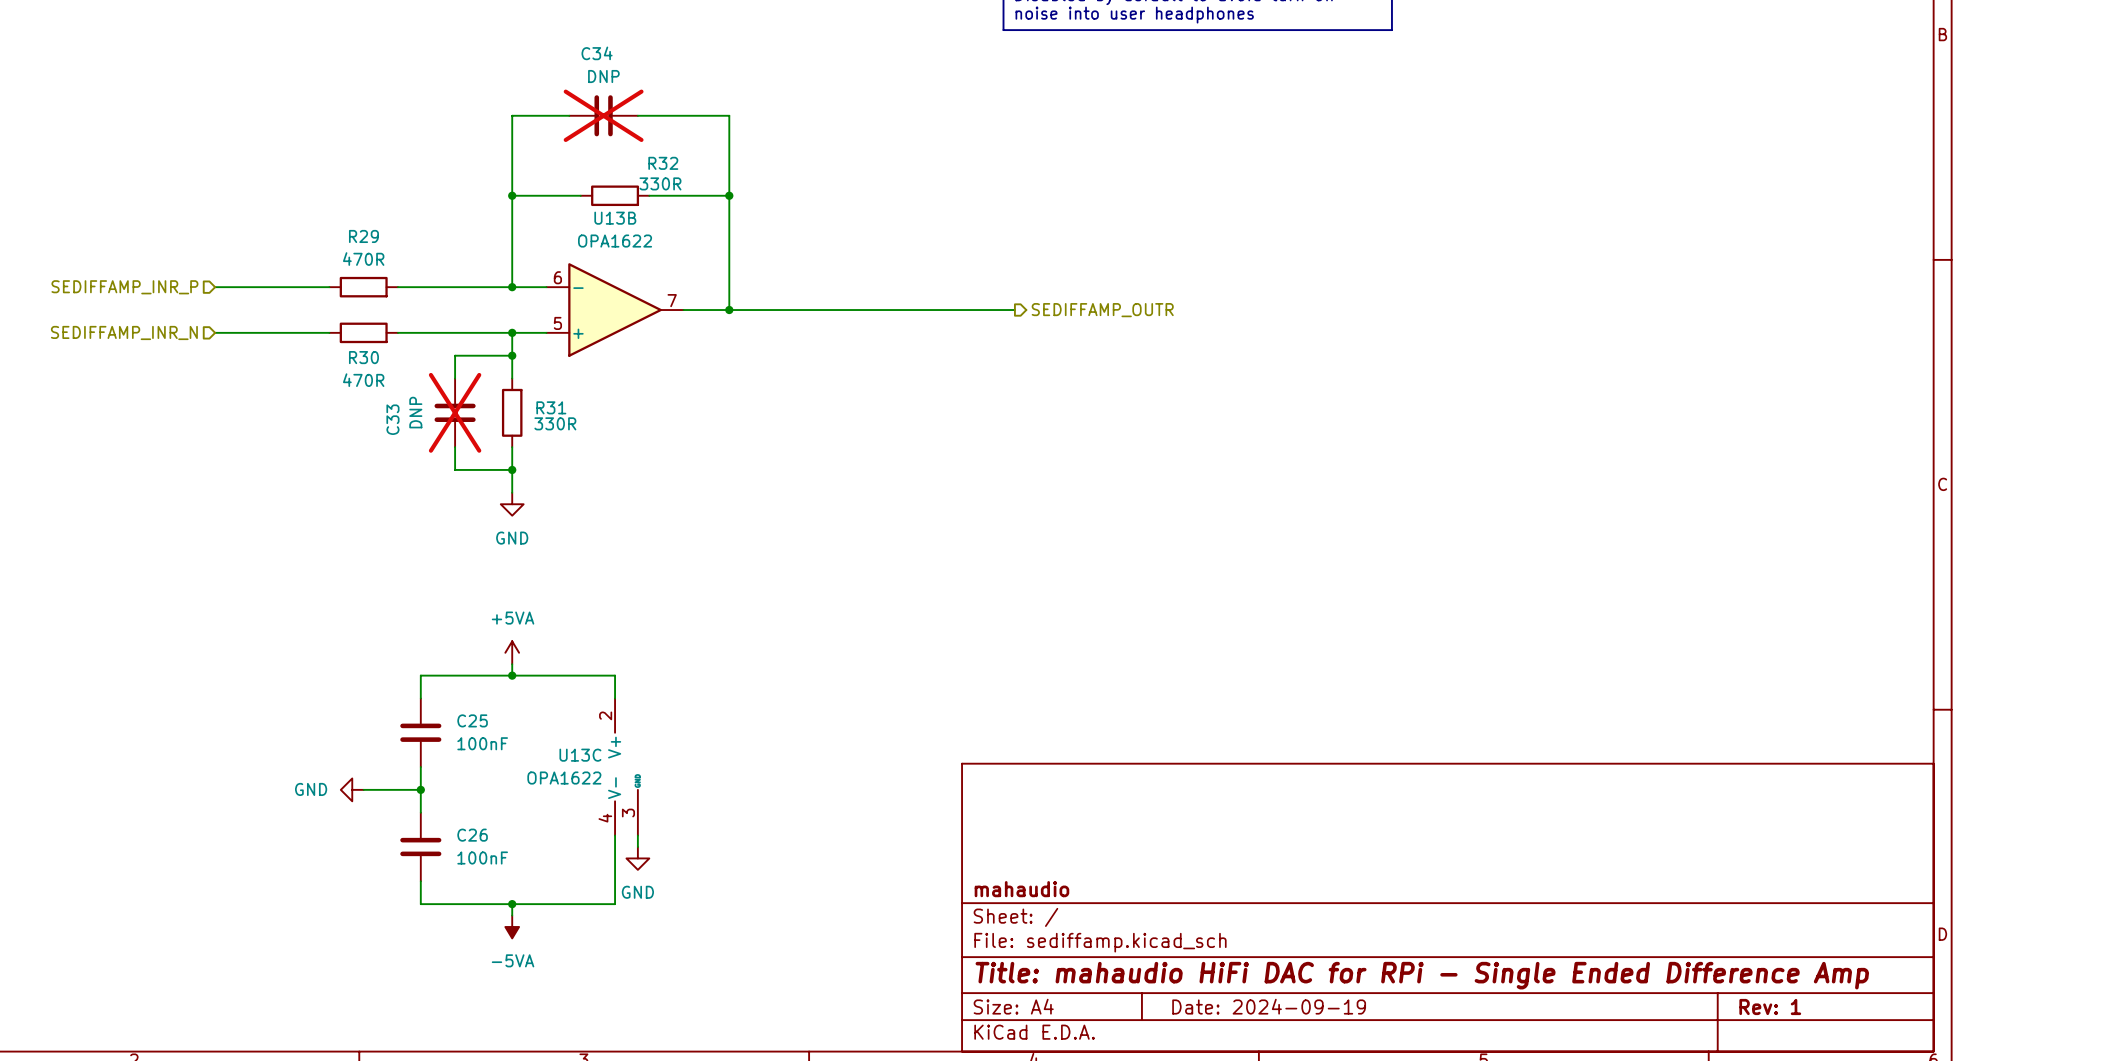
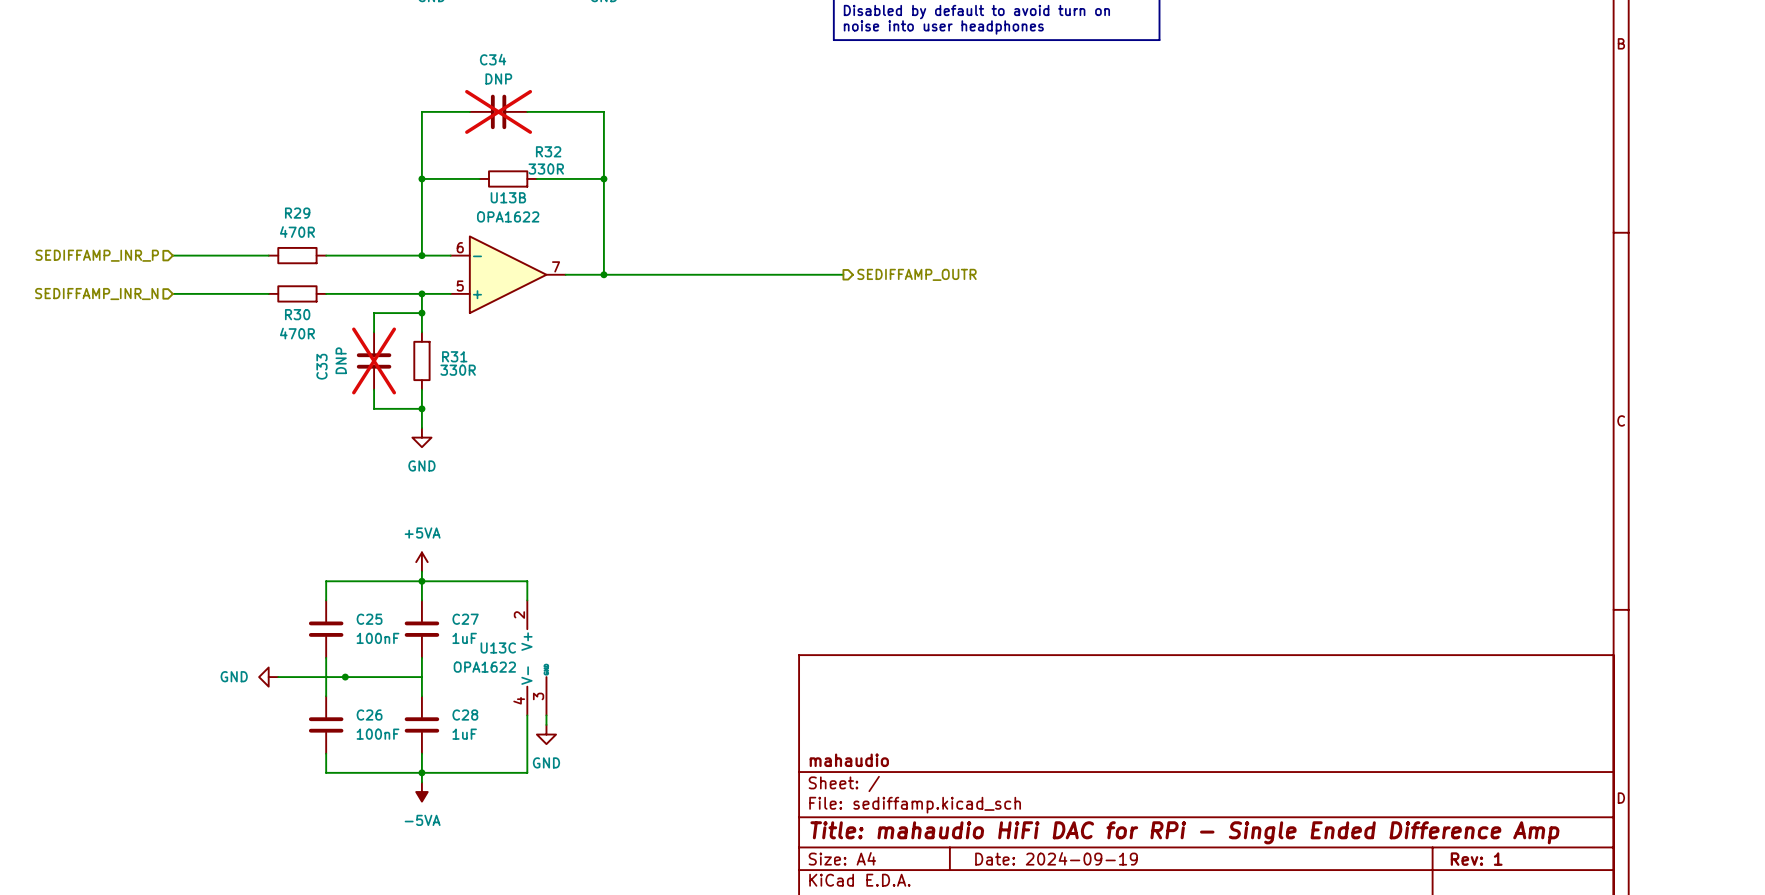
wire: (420, 675) (420, 698) -> (345, 581) (326, 581) (326, 600)
wire: none -> (421, 581) (421, 600)
wire: (615, 675) (615, 698) -> (508, 581) (527, 581) (527, 600)
C25 position: (420, 732) -> (326, 629)
C27: none -> 1uF (421, 629)
wire: none -> (326, 657) (326, 696)
wire: (420, 767) (420, 812) -> (421, 657) (421, 696)
U13C position: (626, 767) -> (536, 657)
power symbol position: GND (352, 789) -> GND (268, 677)
wire: none -> (345, 677) (421, 677)
wire: (615, 835) (615, 904) -> (527, 724) (527, 772) (508, 772)
wire: none -> (546, 715) (546, 724)
C26 position: (420, 847) -> (326, 724)
C28: none -> 1uF (421, 724)
power symbol position: GND (637, 858) -> GND (546, 734)
wire: (420, 881) (420, 904) -> (326, 753) (326, 772) (345, 772)
wire: none -> (421, 753) (421, 772)

